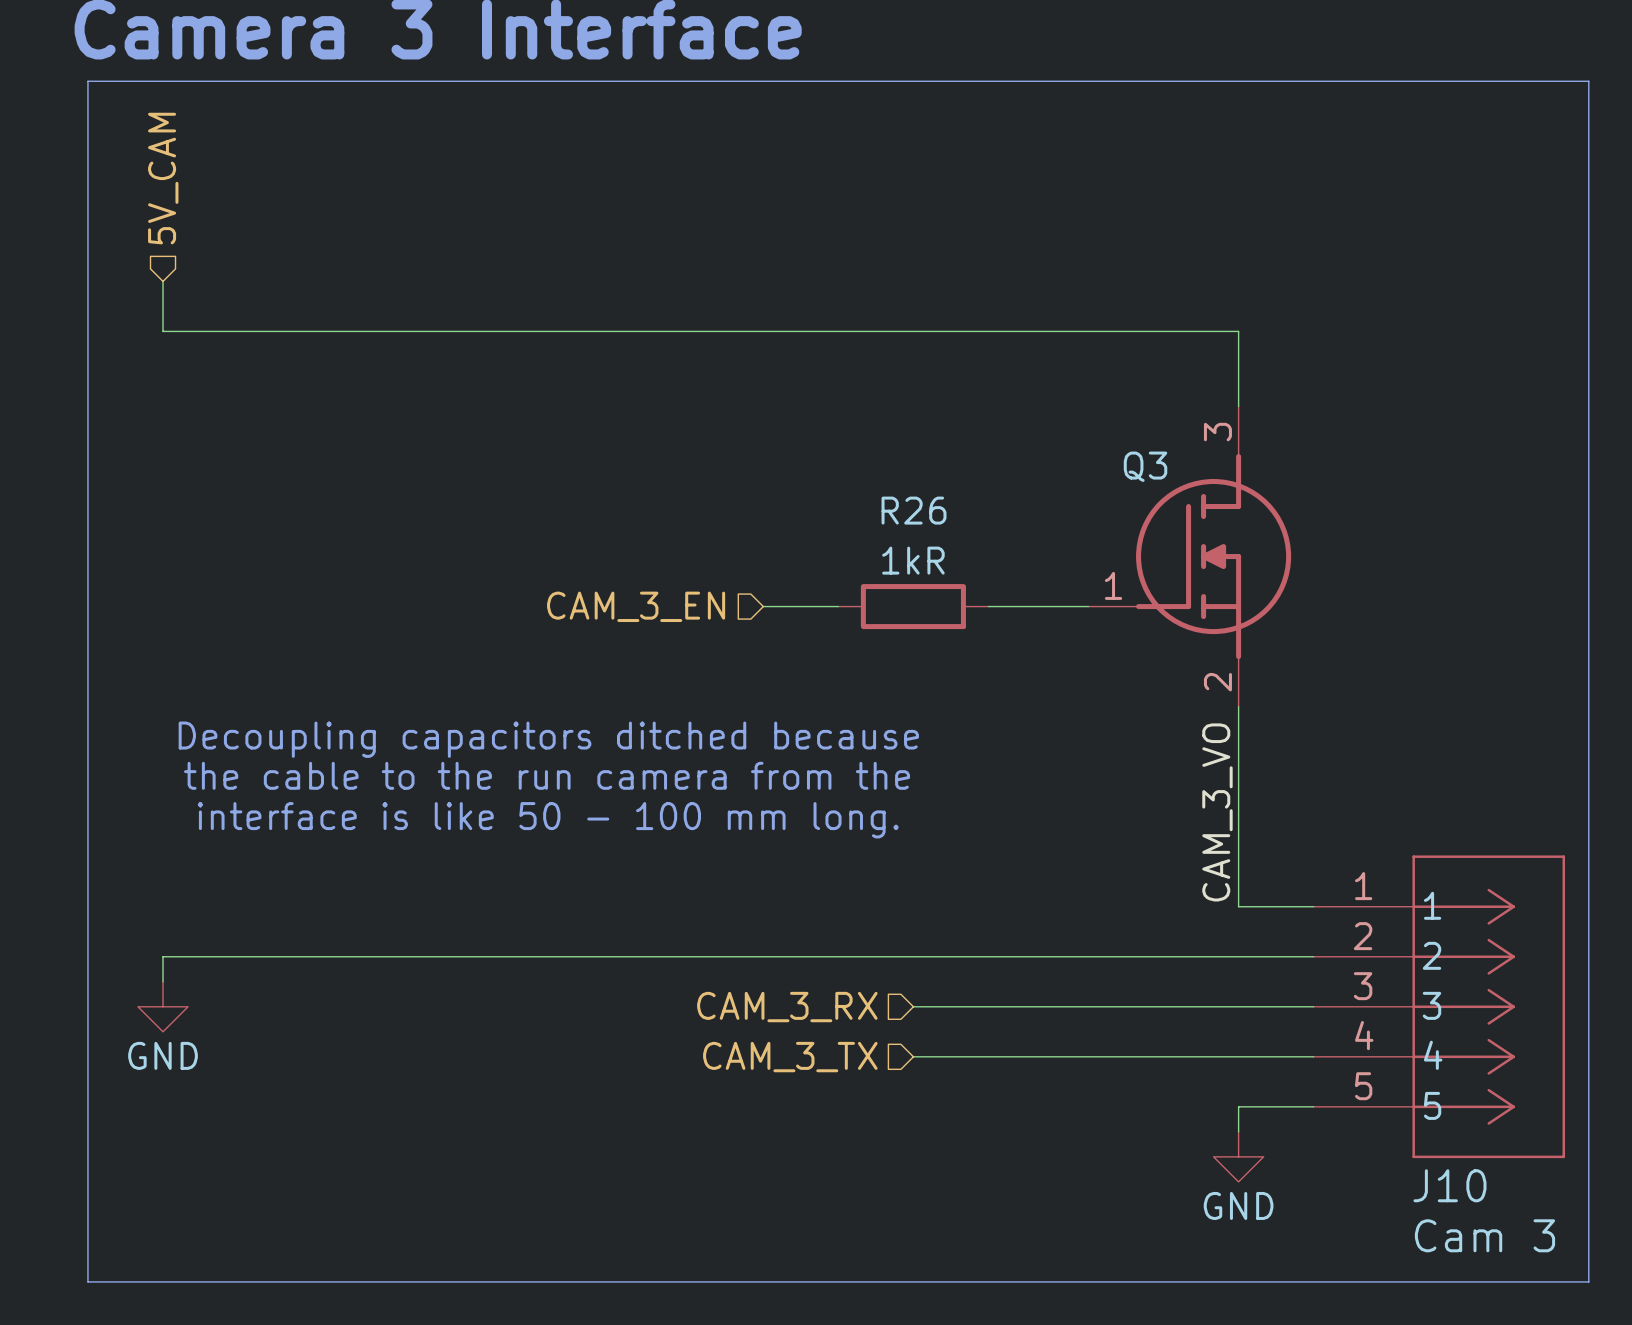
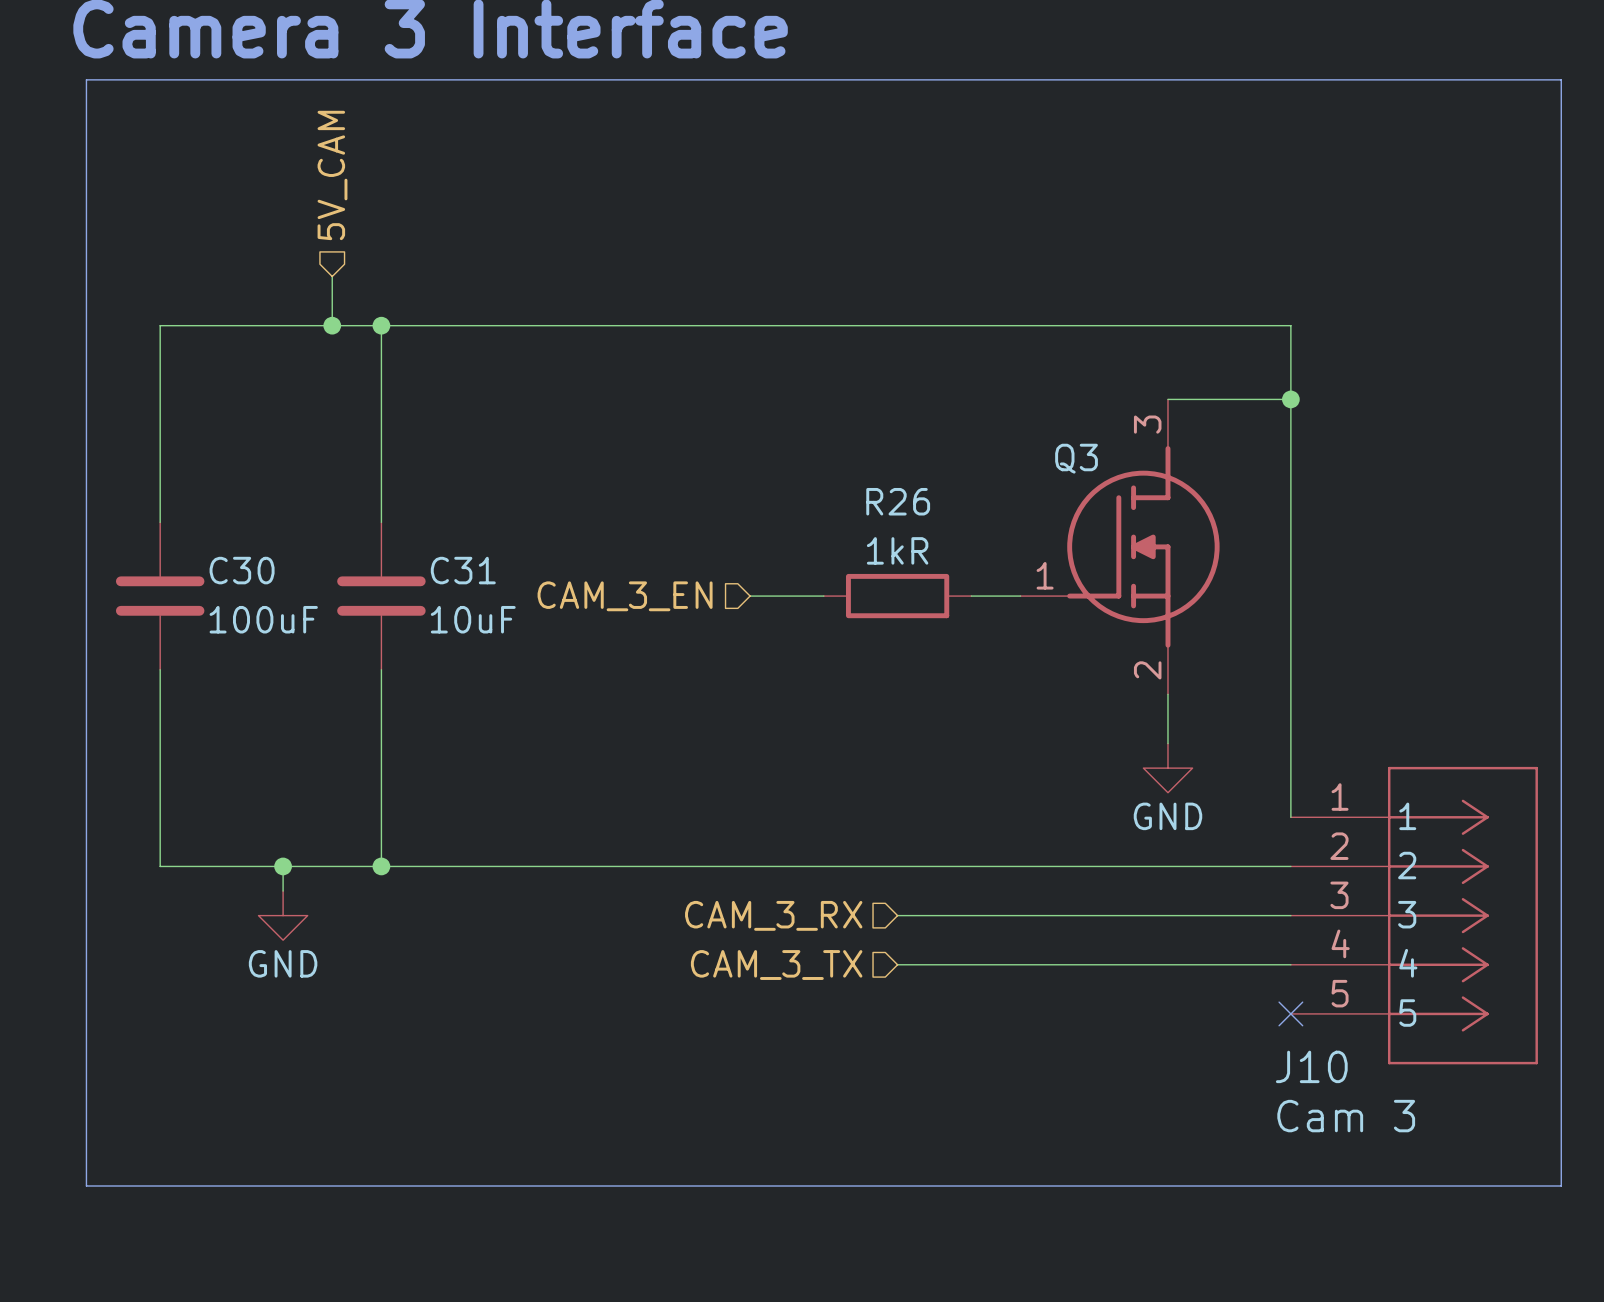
hierarchical label position: 5V_CAM (163, 178) -> 5V_CAM (332, 175)
wire: (163, 281) (163, 331) -> (160, 522) (160, 325)
wire: none -> (332, 276) (332, 325)
junction: none -> (332, 325)
wire: none -> (381, 325) (381, 522)
junction: none -> (381, 325)
wire: (1238, 331) (1238, 406) -> (1217, 325) (1290, 325) (1290, 817)
wire: none -> (1167, 399) (1290, 399)
junction: none -> (1290, 399)
Q3 position: (1189, 556) -> (1120, 546)
C30: none -> 100uF (160, 596)
C31: none -> 10uF (381, 596)
wire: none -> (160, 669) (160, 866) (1290, 866)
wire: none -> (381, 669) (381, 866)
wire: none -> (1167, 694) (1167, 743)
wire: (1238, 706) (1238, 906) (1313, 906) -> none
text: Decoupling capacitors ditched because (548, 739) -> none
text: the cable to the run camera from the (547, 775) -> none
label: CAM_3_VO (1217, 812) -> none
text: interface is like 50 - 100 mm long. (548, 820) -> none
wire: none -> (283, 866) (283, 891)
junction: none -> (283, 866)
junction: none -> (381, 866)
wire: (1313, 956) (163, 956) (163, 981) -> none
power symbol position: GND (163, 1006) -> GND (283, 915)
wire: (913, 1006) (1313, 1006) -> (897, 915) (1290, 915)
J10 position: (1439, 1006) -> (1414, 915)
hierarchical label position: CAM_3_RX (787, 1007) -> CAM_3_RX (773, 915)
no-connect mark: none -> (1290, 1013)
wire: (913, 1056) (1313, 1056) -> (897, 964) (1290, 964)
hierarchical label position: CAM_3_TX (790, 1057) -> CAM_3_TX (776, 965)
wire: (1313, 1106) (1238, 1106) (1238, 1131) -> none
power symbol position: GND (1238, 1156) -> GND (1167, 768)
J10 name position: J10 (1449, 1185) -> J10 (1311, 1066)
line: (87, 1206) (87, 1281) (1588, 1281) (1588, 1206) -> (86, 1186) (1561, 1186)
J10 value position: Cam 3 (1484, 1235) -> Cam 3 (1346, 1116)

